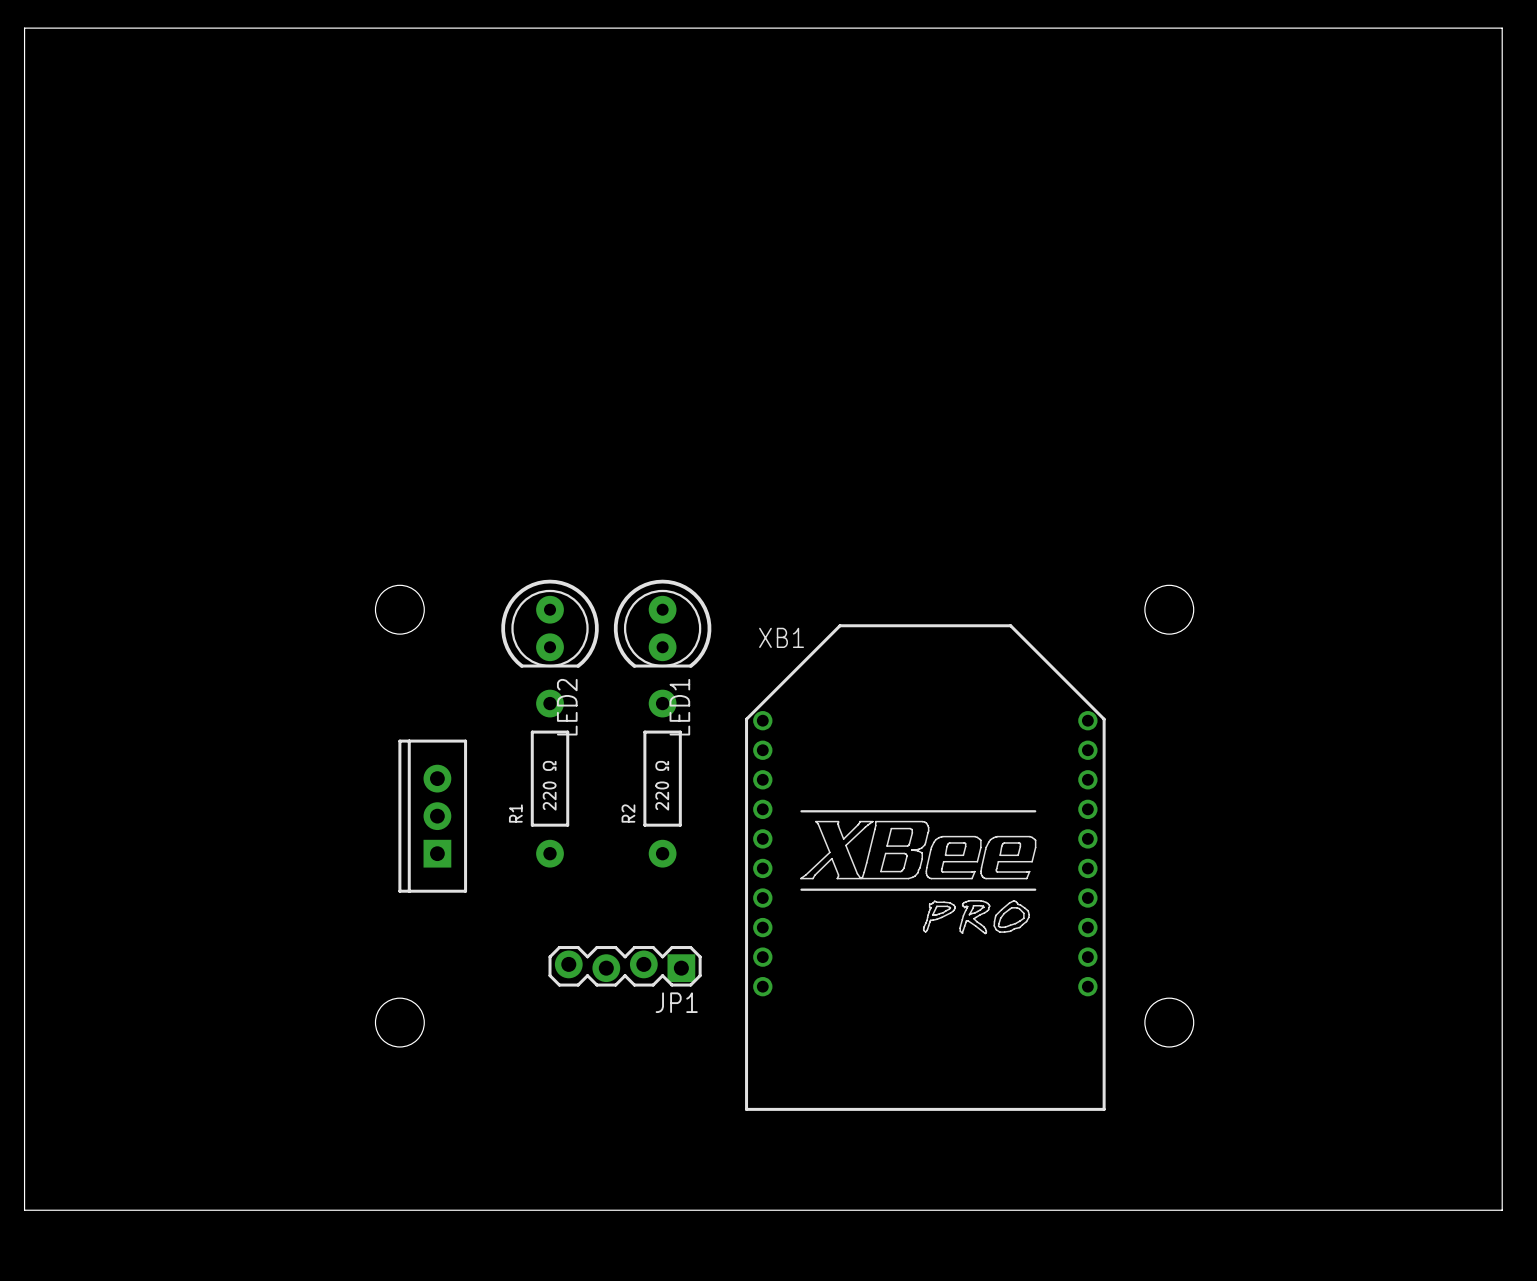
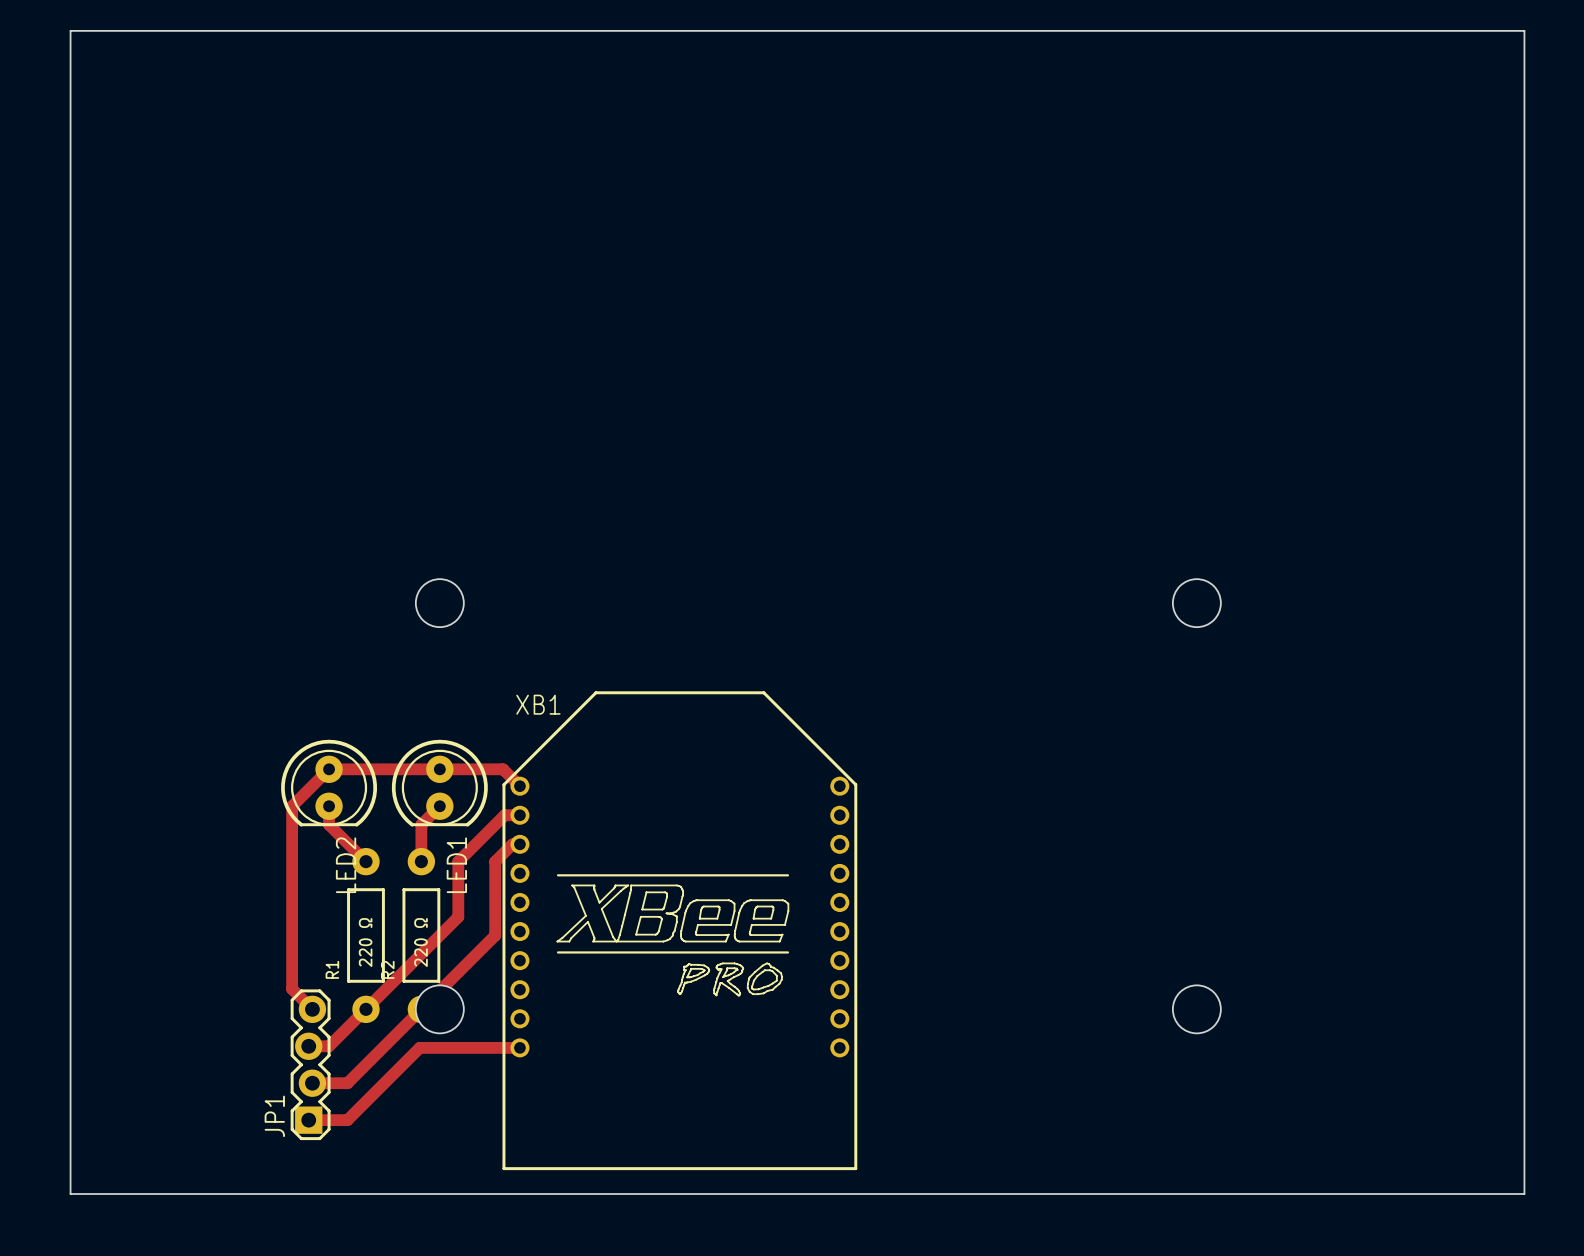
LED2 position: (550, 623) -> (329, 783)
LED1 position: (662, 623) -> (439, 783)
R1 position: (550, 778) -> (365, 935)
R2 position: (662, 778) -> (421, 935)
track: none -> (519, 786) (503, 769) (329, 769) (292, 806) (292, 989) (312, 1009)
track: none -> (329, 806) (329, 824) (365, 861)
track: none -> (439, 806) (421, 824) (421, 861)
part: (432, 816) -> none
track: none -> (519, 815) (504, 815) (458, 861) (458, 917) (329, 1046) (308, 1046)
track: none -> (519, 844) (512, 844) (495, 861) (495, 935) (347, 1083) (312, 1083)
XB1 position: (925, 867) -> (679, 930)
JP1 rotation: 0° (625, 966) -> 90° clockwise (310, 1064)
JP1 position: (625, 966) -> (310, 1064)
track: none -> (519, 1047) (419, 1047) (347, 1120) (310, 1120)

